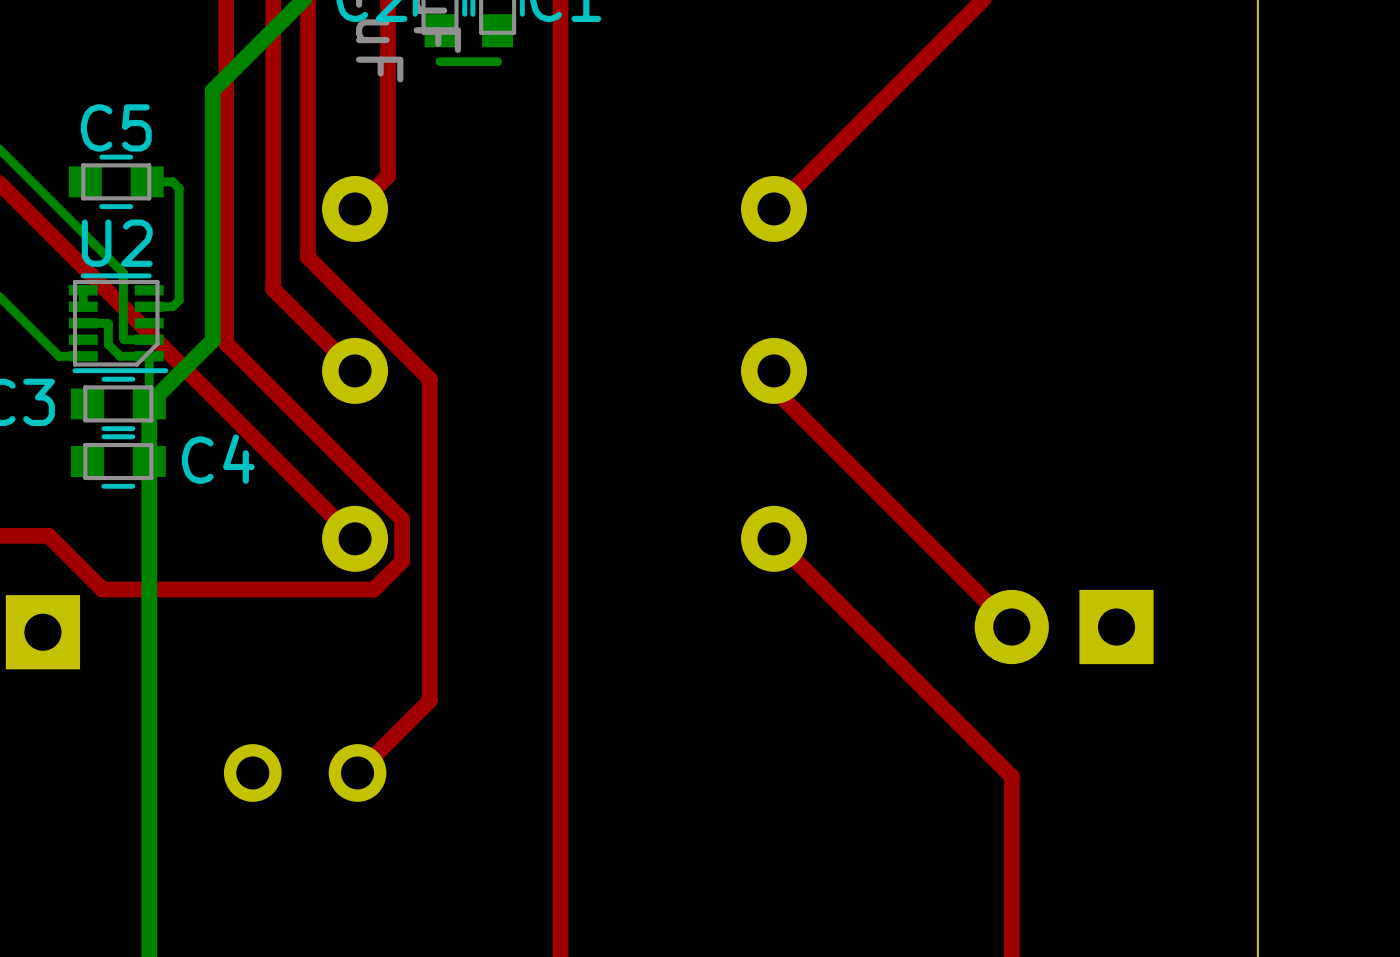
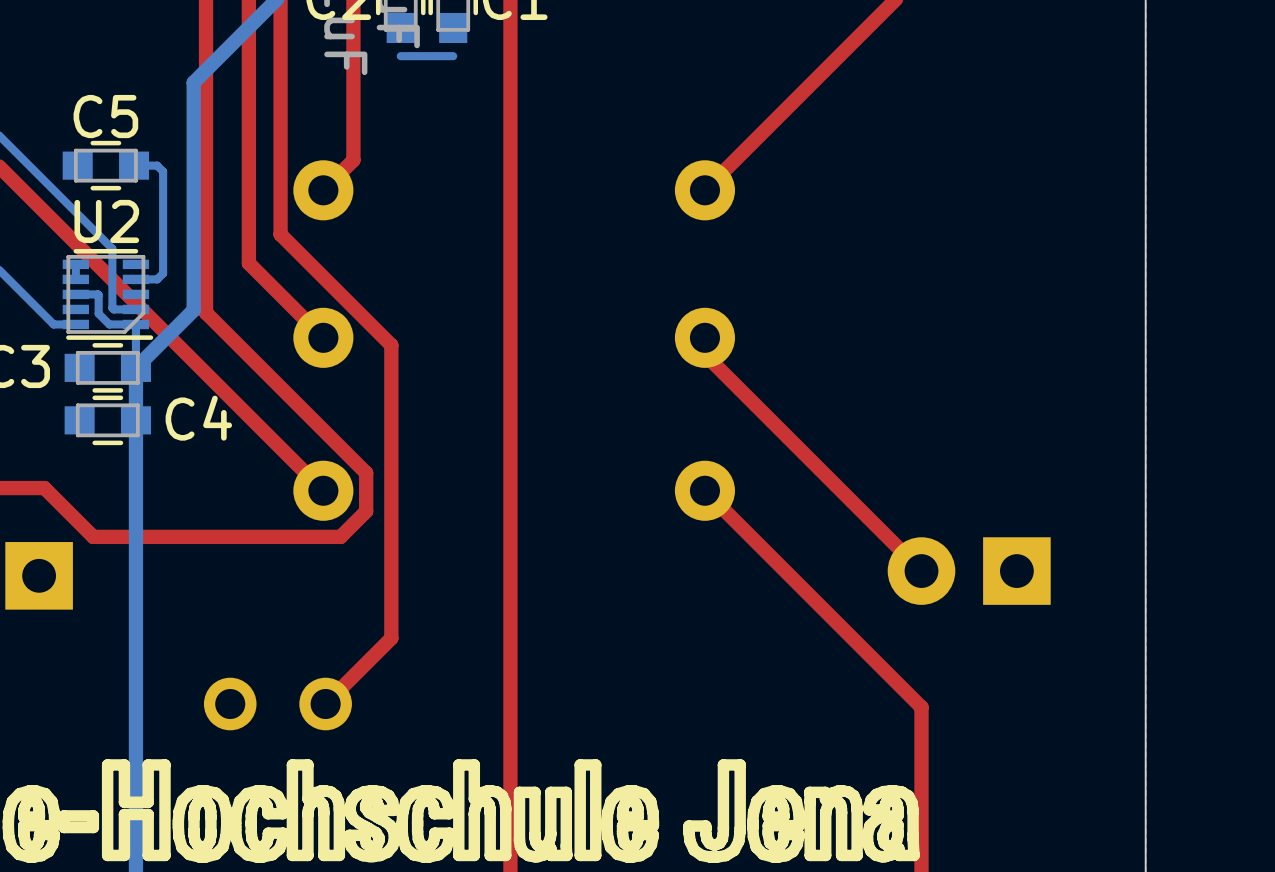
line: none -> (164, 764) (164, 855) (148, 855) (148, 814) (124, 814) (124, 855) (107, 855) (107, 764) (124, 764) (124, 802) (148, 802) (148, 764) (164, 764)
line: none -> (307, 764) (292, 764) (292, 855) (307, 855) (308, 809) (309, 805) (315, 800) (320, 801) (323, 808) (323, 855) (339, 855) (338, 801) (335, 795) (325, 790) (314, 792) (307, 798) (307, 764)
line: none -> (474, 764) (458, 764) (458, 855) (474, 855) (474, 809) (476, 805) (481, 800) (486, 801) (490, 808) (490, 855) (505, 855) (504, 801) (502, 795) (491, 790) (480, 792) (474, 798) (474, 764)
line: none -> (595, 764) (580, 764) (580, 855) (595, 855) (595, 764)
line: none -> (740, 764) (723, 764) (723, 833) (719, 843) (715, 844) (709, 843) (706, 839) (705, 826) (689, 826) (690, 841) (694, 850) (701, 855) (710, 857) (725, 855) (734, 850) (738, 841) (740, 764)
line: none -> (35, 790) (45, 793) (51, 801) (54, 825) (23, 825) (25, 843) (30, 846) (35, 845) (39, 834) (54, 834) (54, 837) (48, 851) (41, 855) (28, 856) (18, 854) (11, 847) (8, 837) (9, 811) (12, 801) (19, 793) (35, 790)
line: none -> (206, 790) (189, 793) (182, 800) (179, 811) (178, 837) (182, 847) (189, 854) (199, 856) (215, 854) (222, 847) (226, 836) (226, 809) (223, 799) (215, 793) (206, 790)
line: none -> (262, 790) (247, 793) (239, 801) (236, 812) (236, 839) (239, 848) (247, 854) (256, 856) (272, 854) (279, 848) (283, 835) (283, 833) (268, 833) (267, 842) (261, 846) (254, 844) (251, 839) (251, 815) (254, 803) (258, 800) (264, 802) (268, 813) (282, 813) (281, 803) (277, 796) (262, 790)
line: none -> (429, 790) (413, 793) (405, 801) (402, 812) (402, 839) (406, 848) (413, 854) (423, 856) (438, 854) (445, 848) (449, 835) (449, 833) (434, 833) (433, 842) (427, 846) (420, 844) (418, 839) (417, 815) (421, 803) (425, 800) (431, 802) (434, 813) (449, 813) (447, 803) (444, 796) (429, 790)
line: none -> (634, 790) (618, 793) (611, 801) (607, 811) (607, 837) (610, 847) (617, 854) (627, 856) (640, 855) (647, 851) (652, 837) (653, 834) (638, 834) (634, 845) (628, 846) (624, 843) (622, 825) (653, 825) (650, 801) (644, 793) (634, 790)
line: none -> (780, 790) (764, 793) (756, 801) (753, 811) (753, 837) (756, 847) (763, 854) (773, 856) (786, 855) (793, 851) (798, 837) (798, 834) (784, 834) (780, 845) (774, 846) (769, 843) (768, 825) (799, 825) (796, 801) (789, 793) (780, 790)
line: none -> (842, 790) (831, 793) (825, 799) (825, 792) (809, 792) (810, 855) (825, 855) (825, 811) (827, 805) (832, 800) (838, 802) (841, 808) (841, 855) (857, 855) (856, 801) (853, 795) (842, 790)
line: none -> (894, 790) (876, 794) (871, 799) (869, 809) (884, 809) (885, 802) (890, 800) (895, 801) (898, 815) (876, 819) (869, 825) (867, 834) (868, 845) (870, 851) (881, 856) (892, 854) (898, 848) (899, 855) (914, 855) (912, 802) (908, 795) (894, 790)
line: none -> (566, 792) (566, 855) (551, 855) (550, 848) (544, 854) (538, 856) (528, 855) (523, 852) (519, 840) (519, 792) (535, 792) (535, 838) (538, 845) (541, 846) (546, 845) (550, 837) (550, 792) (566, 792)
line: none -> (203, 800) (197, 802) (194, 812) (194, 840) (201, 846) (207, 845) (210, 836) (209, 806) (203, 800)
line: none -> (24, 809) (26, 803) (33, 800) (38, 807) (39, 817) (23, 817) (24, 809)
line: none -> (378, 809) (376, 802) (373, 799) (367, 801) (365, 808) (369, 812) (385, 821) (393, 830) (394, 839) (392, 846) (387, 852) (380, 855) (362, 855) (355, 852) (351, 847) (349, 835) (365, 835) (366, 843) (370, 846) (377, 844) (379, 837) (376, 832) (354, 819) (350, 810) (352, 800) (356, 795) (363, 791) (382, 791) (388, 795) (392, 801) (393, 810) (378, 810)
line: none -> (623, 809) (625, 803) (632, 800) (637, 807) (638, 817) (622, 817) (622, 809)
line: none -> (768, 809) (771, 803) (777, 800) (783, 807) (783, 817) (768, 817) (768, 809)
line: none -> (93, 815) (64, 815) (64, 827) (93, 827) (93, 815)
line: none -> (898, 825) (896, 841) (894, 845) (888, 846) (884, 843) (883, 838) (886, 827) (898, 825)

